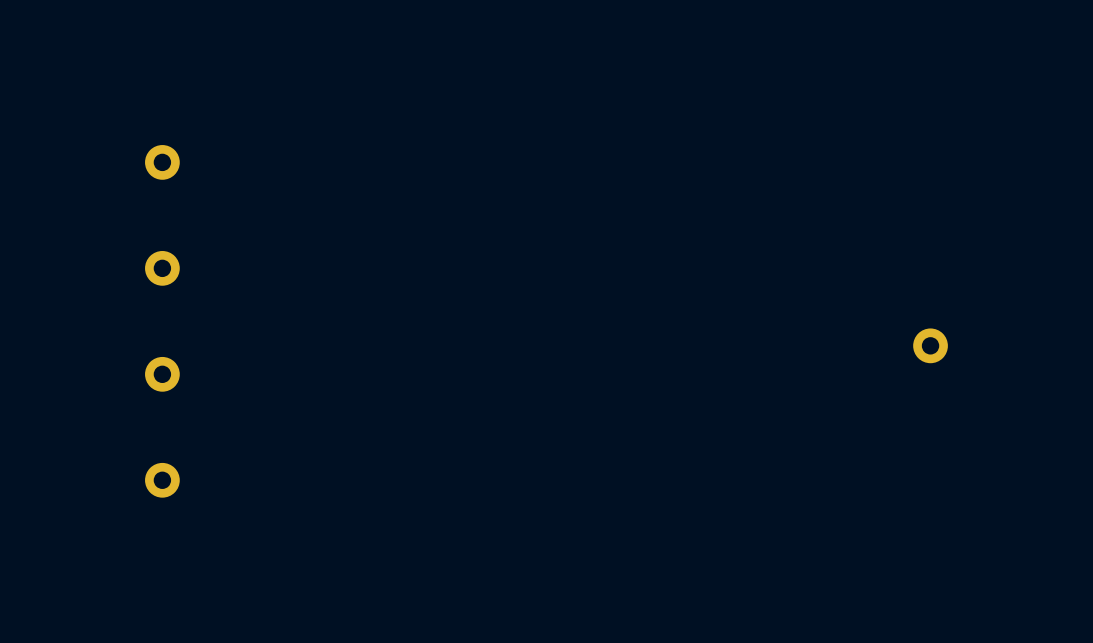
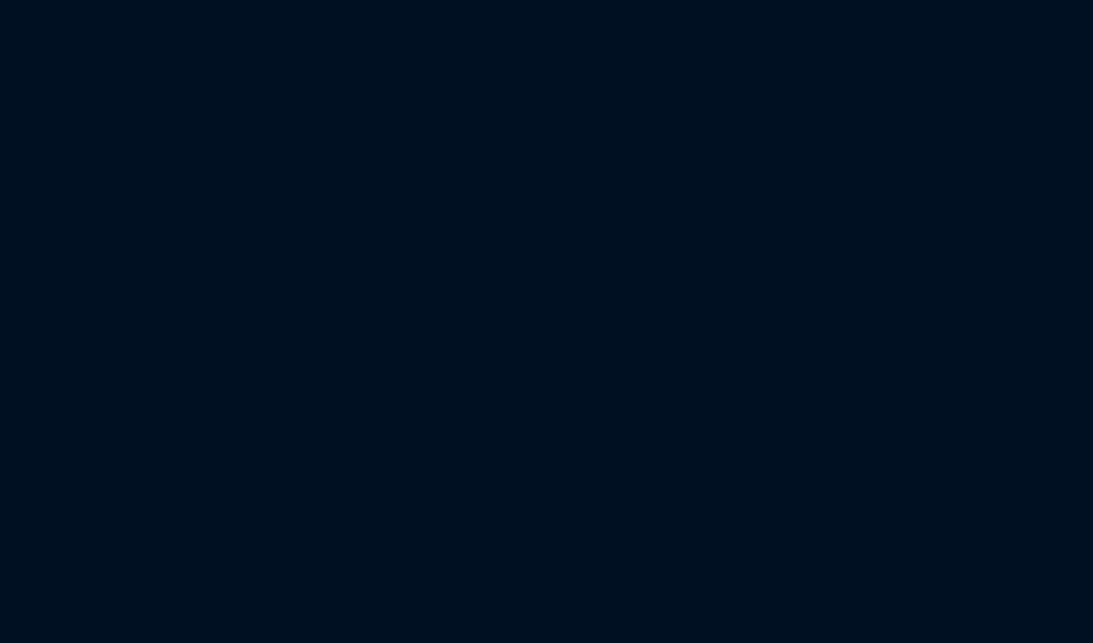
part: (162, 162) -> none
part: (162, 268) -> none
part: (930, 345) -> none
part: (162, 374) -> none
part: (162, 480) -> none

